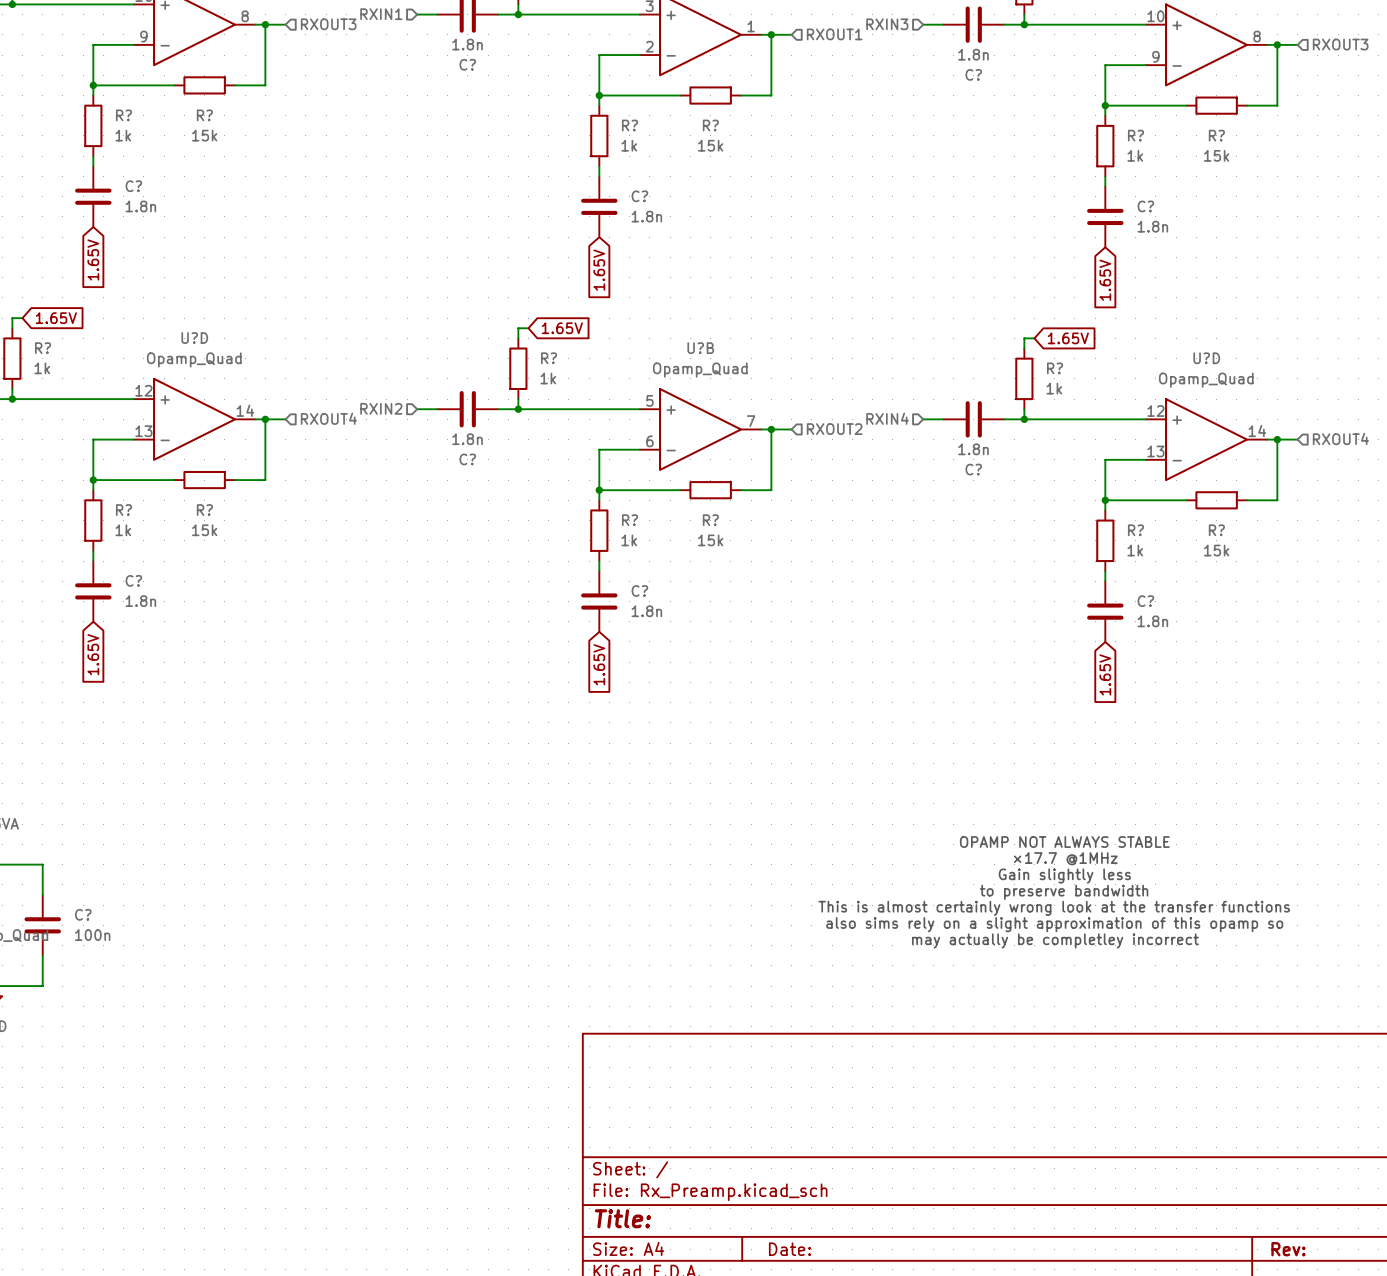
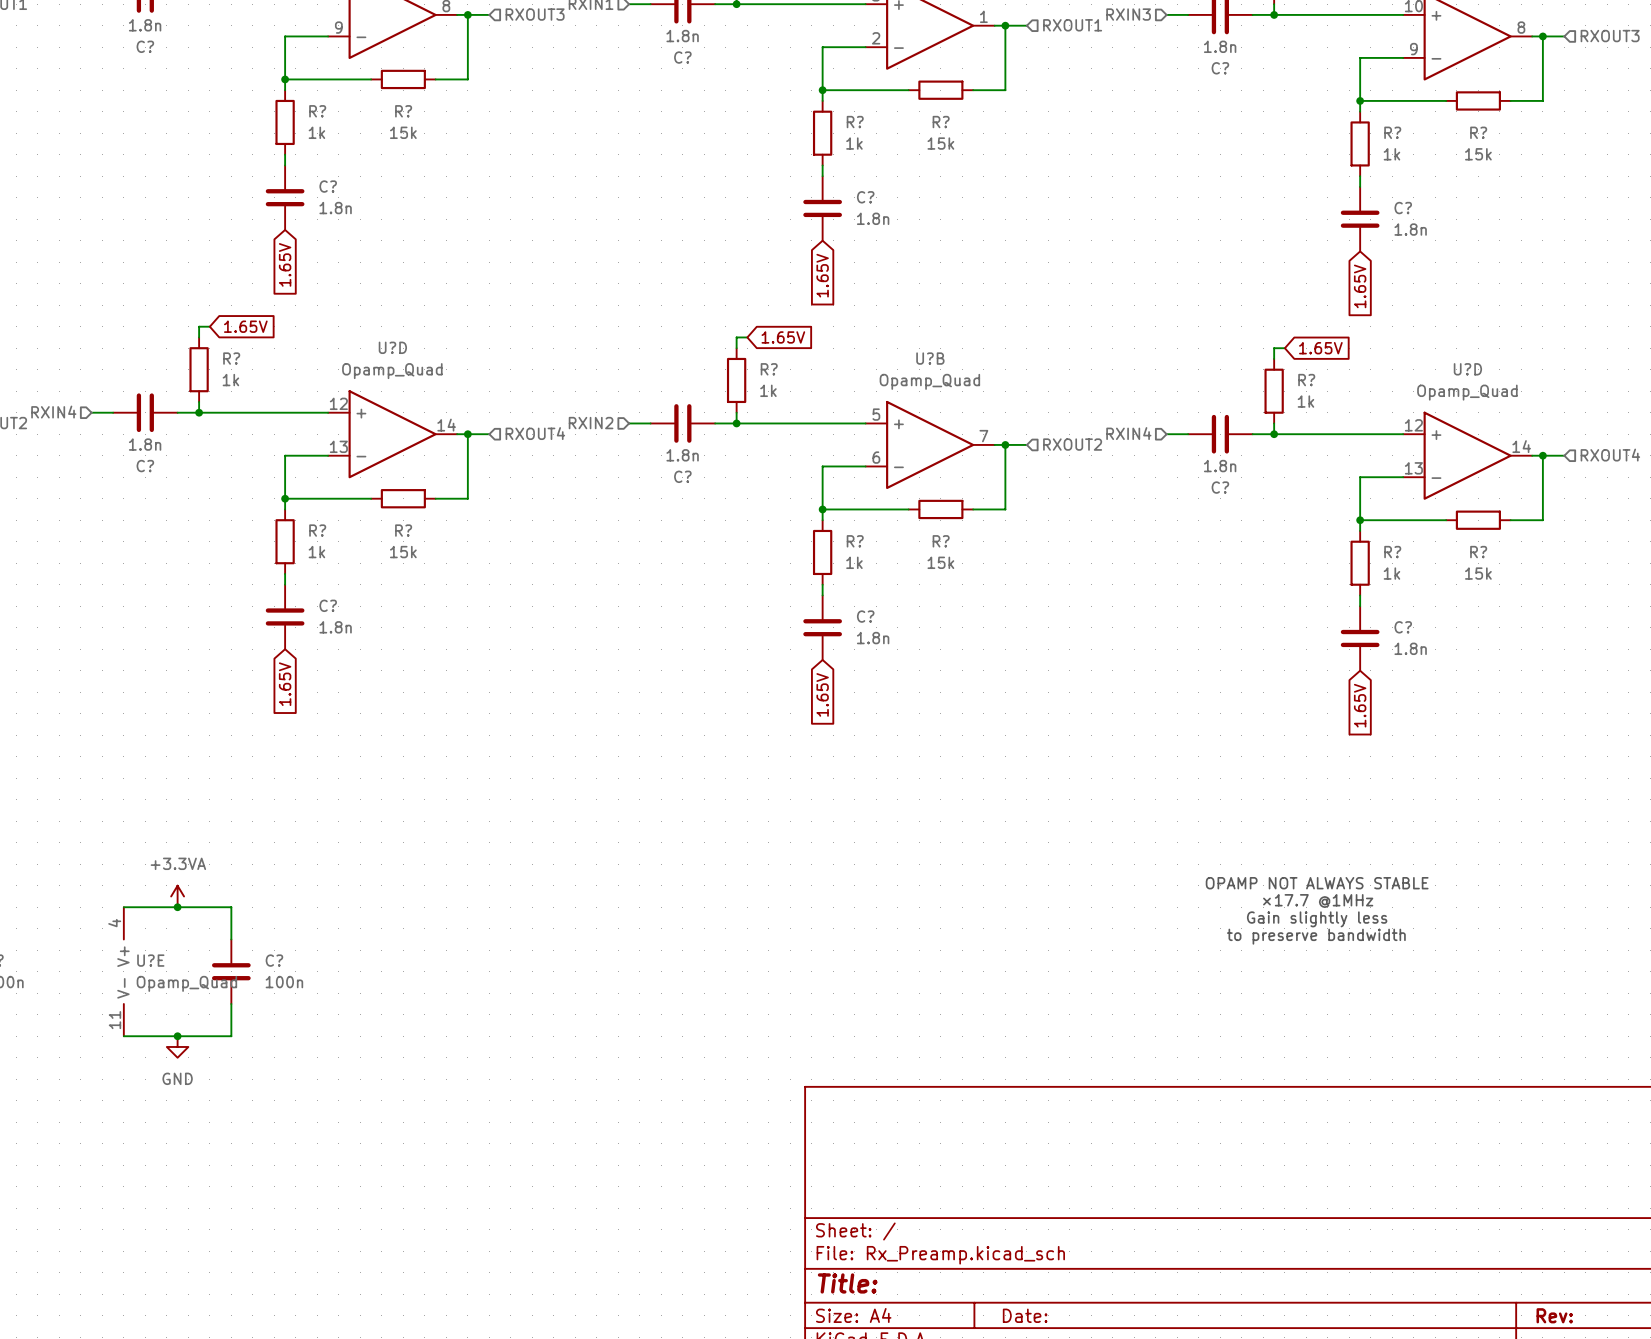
text: This is almost certainly wrong look at the transfer functions (1054, 908) -> none
text: also sims rely on a slight approximation of this opamp so (1054, 924) -> none
text: may actually be completley incorrect (1055, 940) -> none

